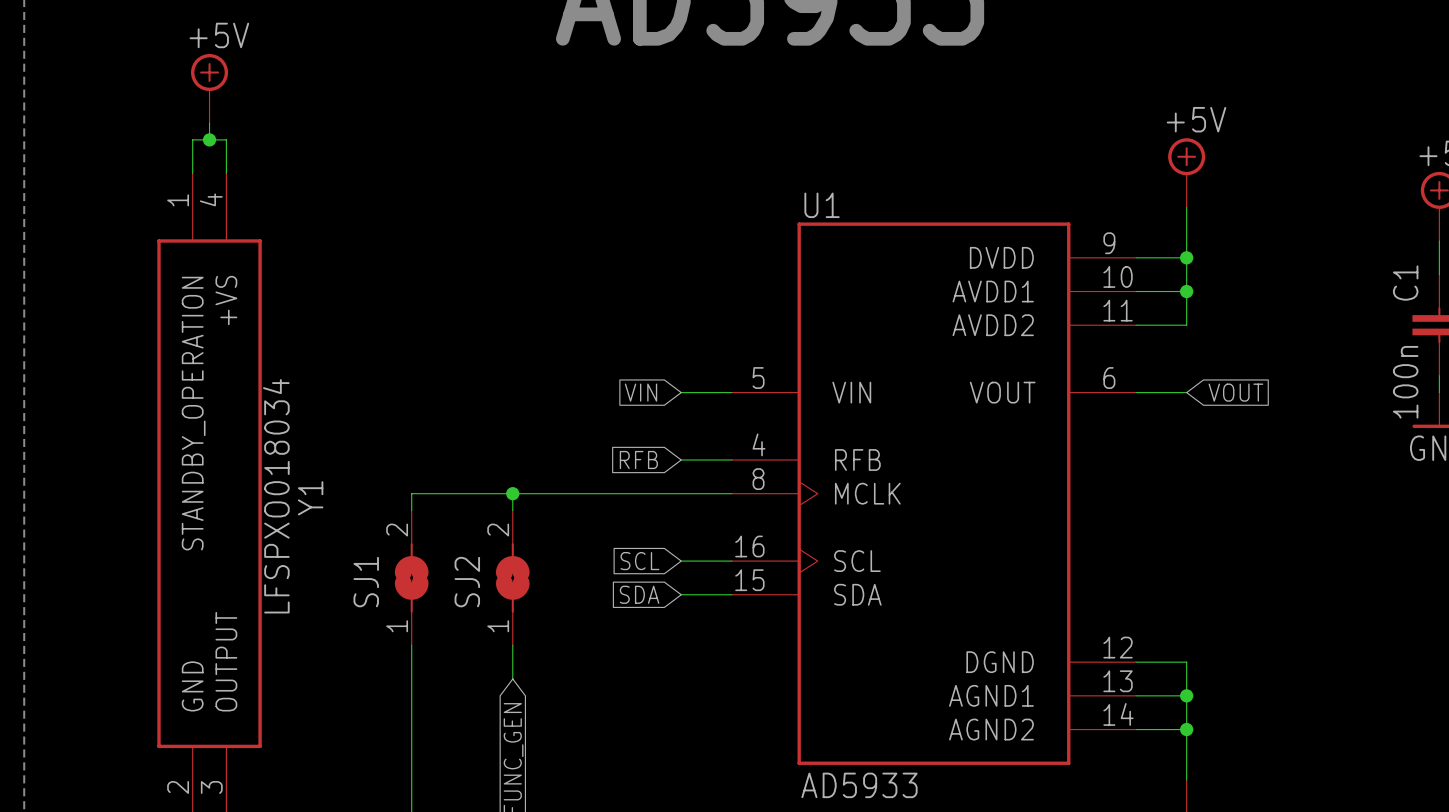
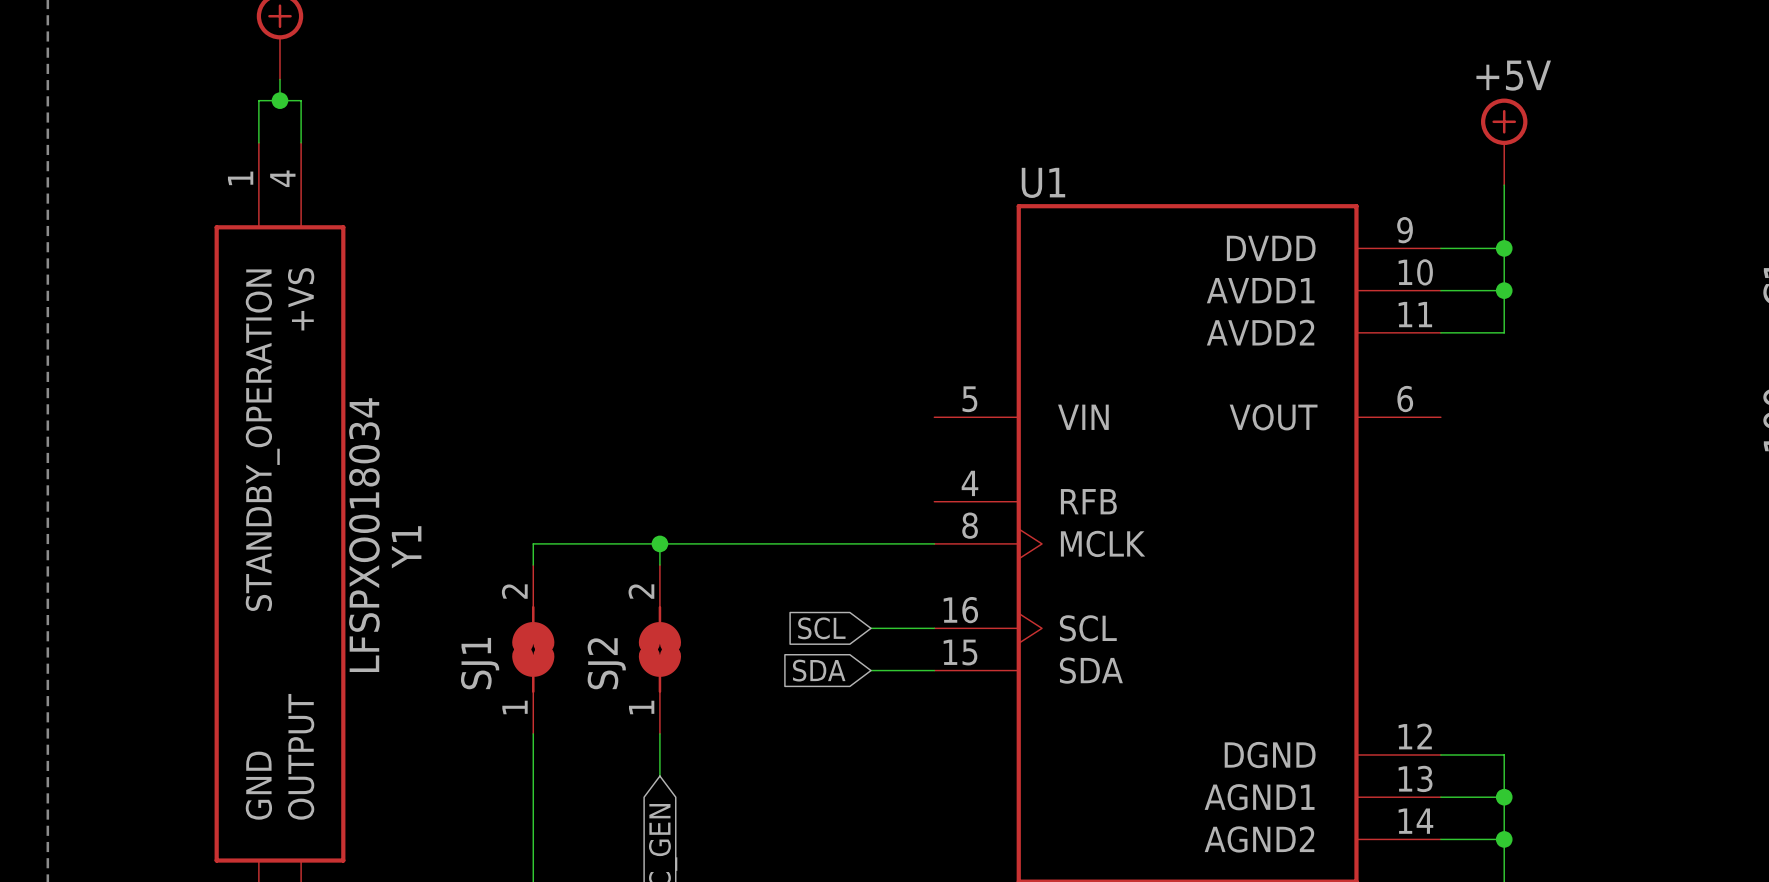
global label: VIN (641, 392) -> none
wire: (681, 392) (731, 392) -> none
wire: (1136, 392) (1186, 392) -> none
global label: VOUT (1235, 392) -> none
global label: RFB (638, 459) -> none
wire: (681, 459) (731, 459) -> none

